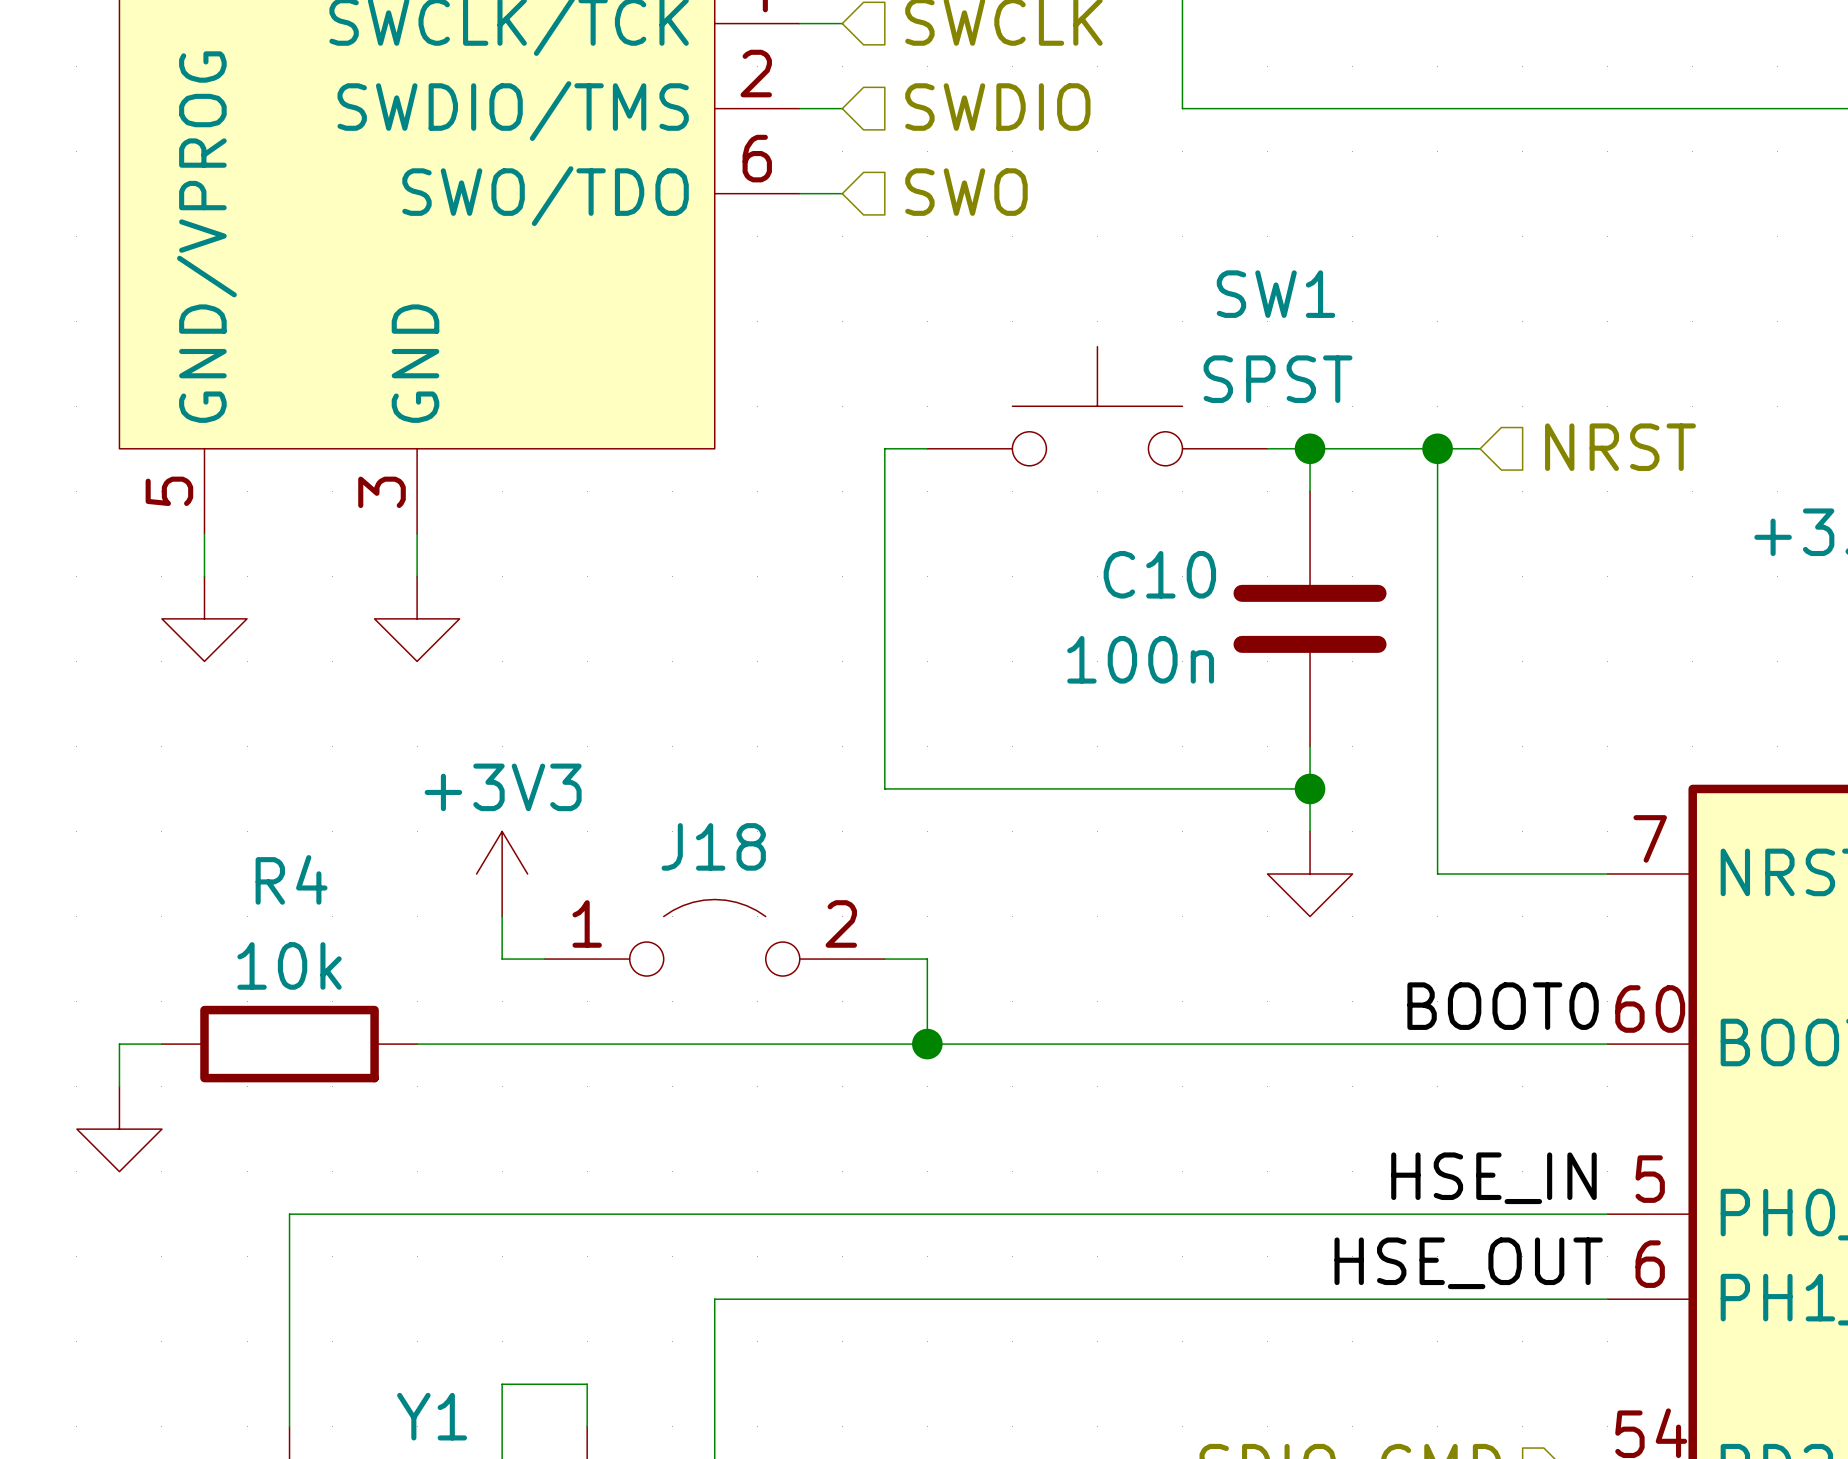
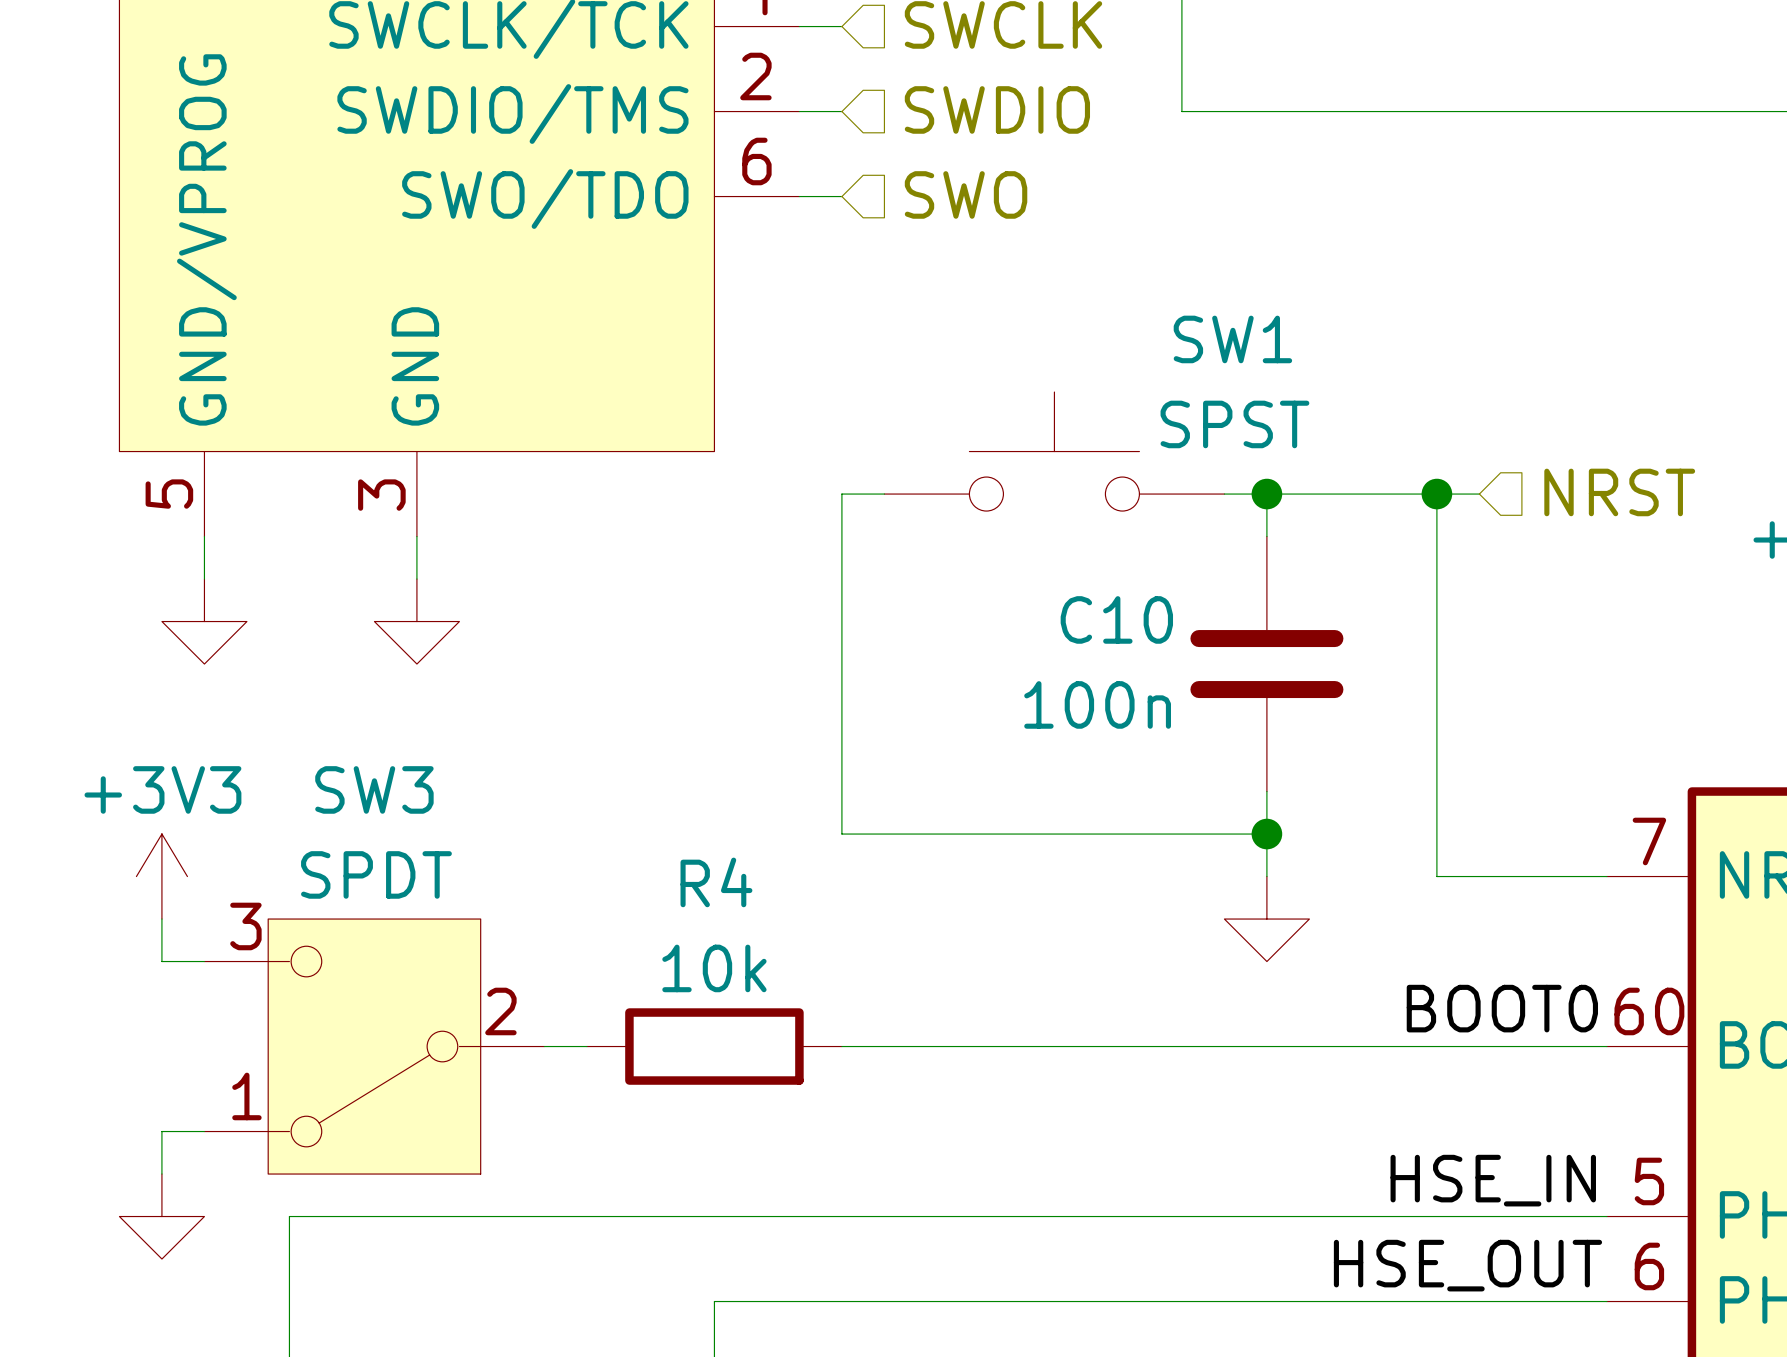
SW1 position: (1097, 406) -> (1054, 451)
hierarchical label position: NRST (1620, 447) -> NRST (1619, 492)
wire: (927, 448) (884, 448) (884, 788) (1310, 788) -> (884, 494) (841, 494) (841, 834) (1266, 834)
wire: (1267, 448) (1480, 448) -> none
wire: (1310, 448) (1310, 491) -> (1266, 494) (1266, 536)
junction position: (1310, 448) -> (1266, 494)
wire: (1437, 448) (1437, 491) -> none
junction position: (1437, 448) -> (1436, 494)
wire: none -> (1224, 494) (1479, 494)
C10 position: (1310, 618) -> (1266, 664)
wire: (1310, 746) (1310, 831) -> (1266, 791) (1266, 876)
junction position: (1310, 788) -> (1266, 834)
power symbol position: +3V3 (502, 874) -> +3V3 (161, 876)
power symbol position: (1310, 874) -> (1266, 919)
wire: (502, 916) (502, 959) (544, 959) -> (161, 919) (161, 961) (204, 961)
J18: (714, 937) -> none
wire: (884, 959) (927, 959) (927, 1044) -> none
wire: (161, 1044) (119, 1044) (119, 1086) -> (204, 1131) (161, 1131) (161, 1174)
R4 position: (289, 1044) -> (714, 1046)
SW3: none -> SPDT (374, 1046)
wire: (587, 1044) (842, 1044) -> none
junction: (927, 1044) -> none
power symbol position: (119, 1129) -> (161, 1216)

